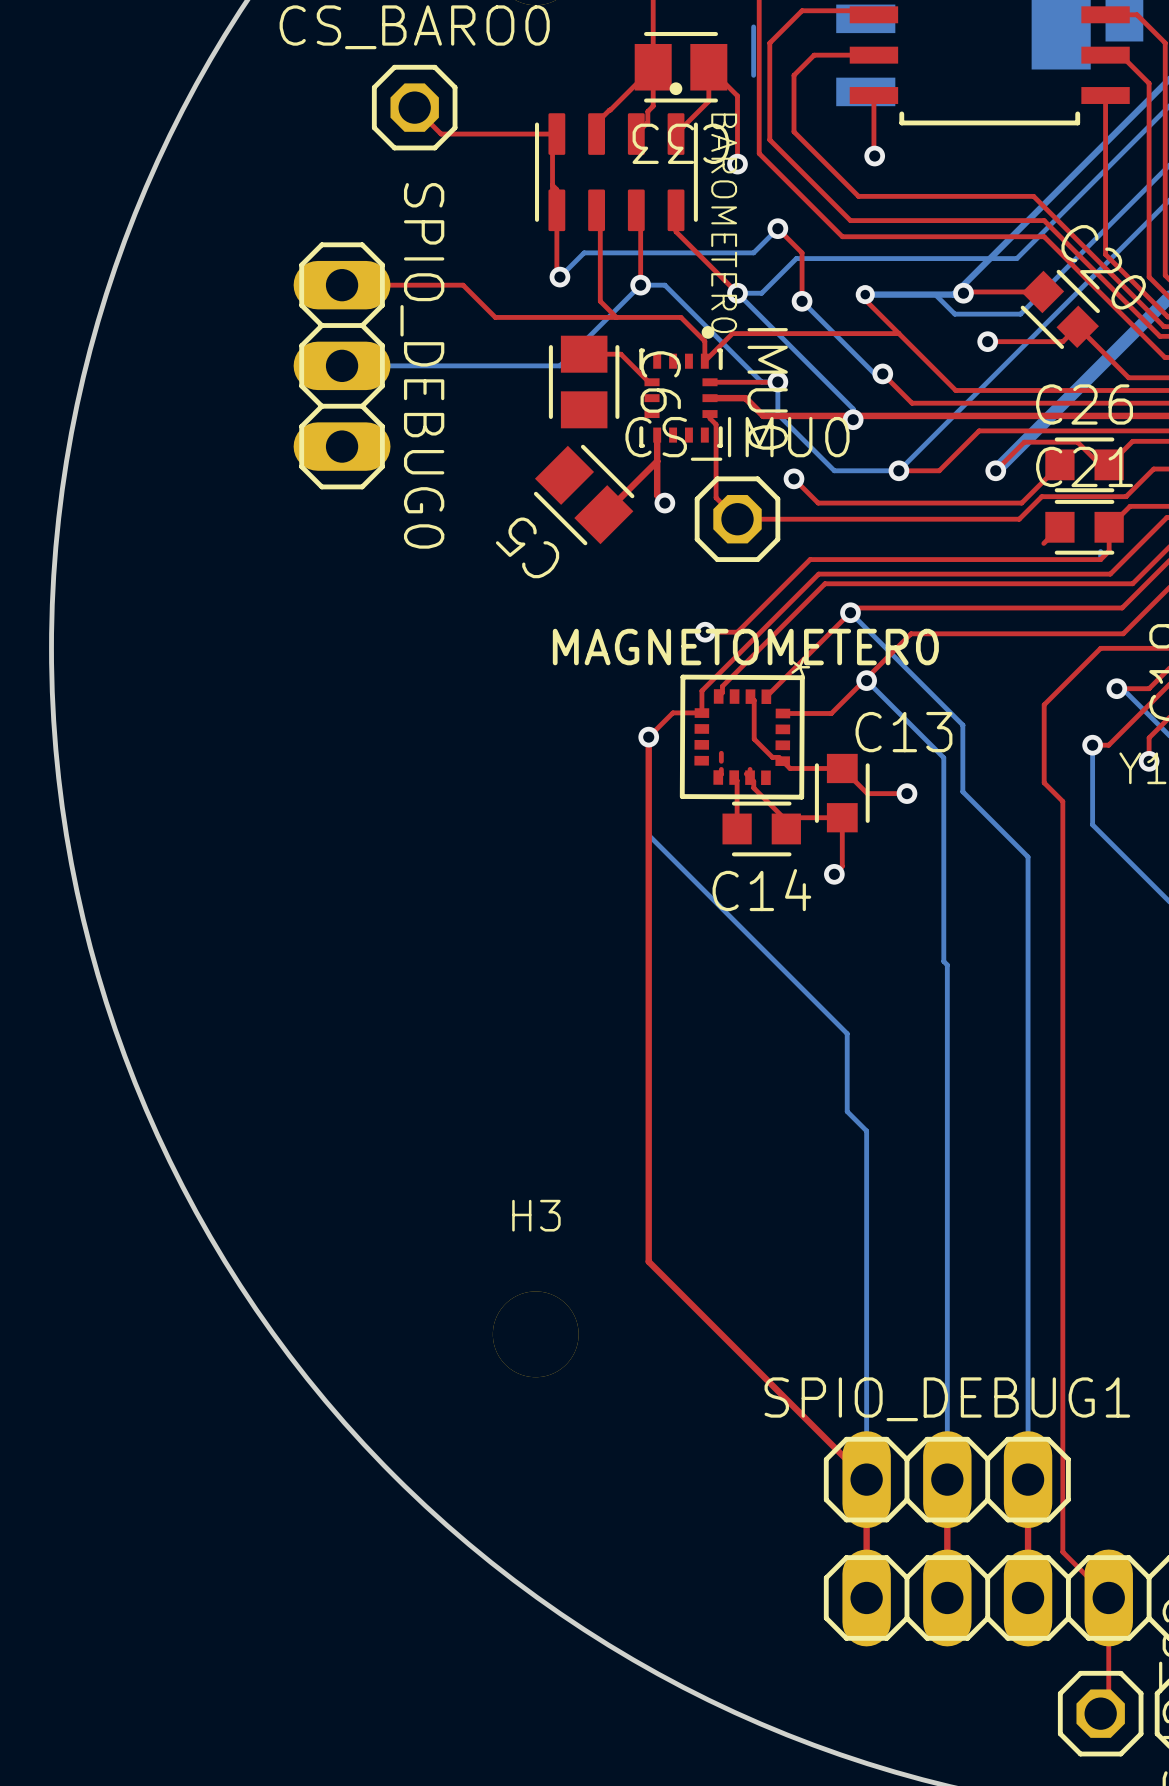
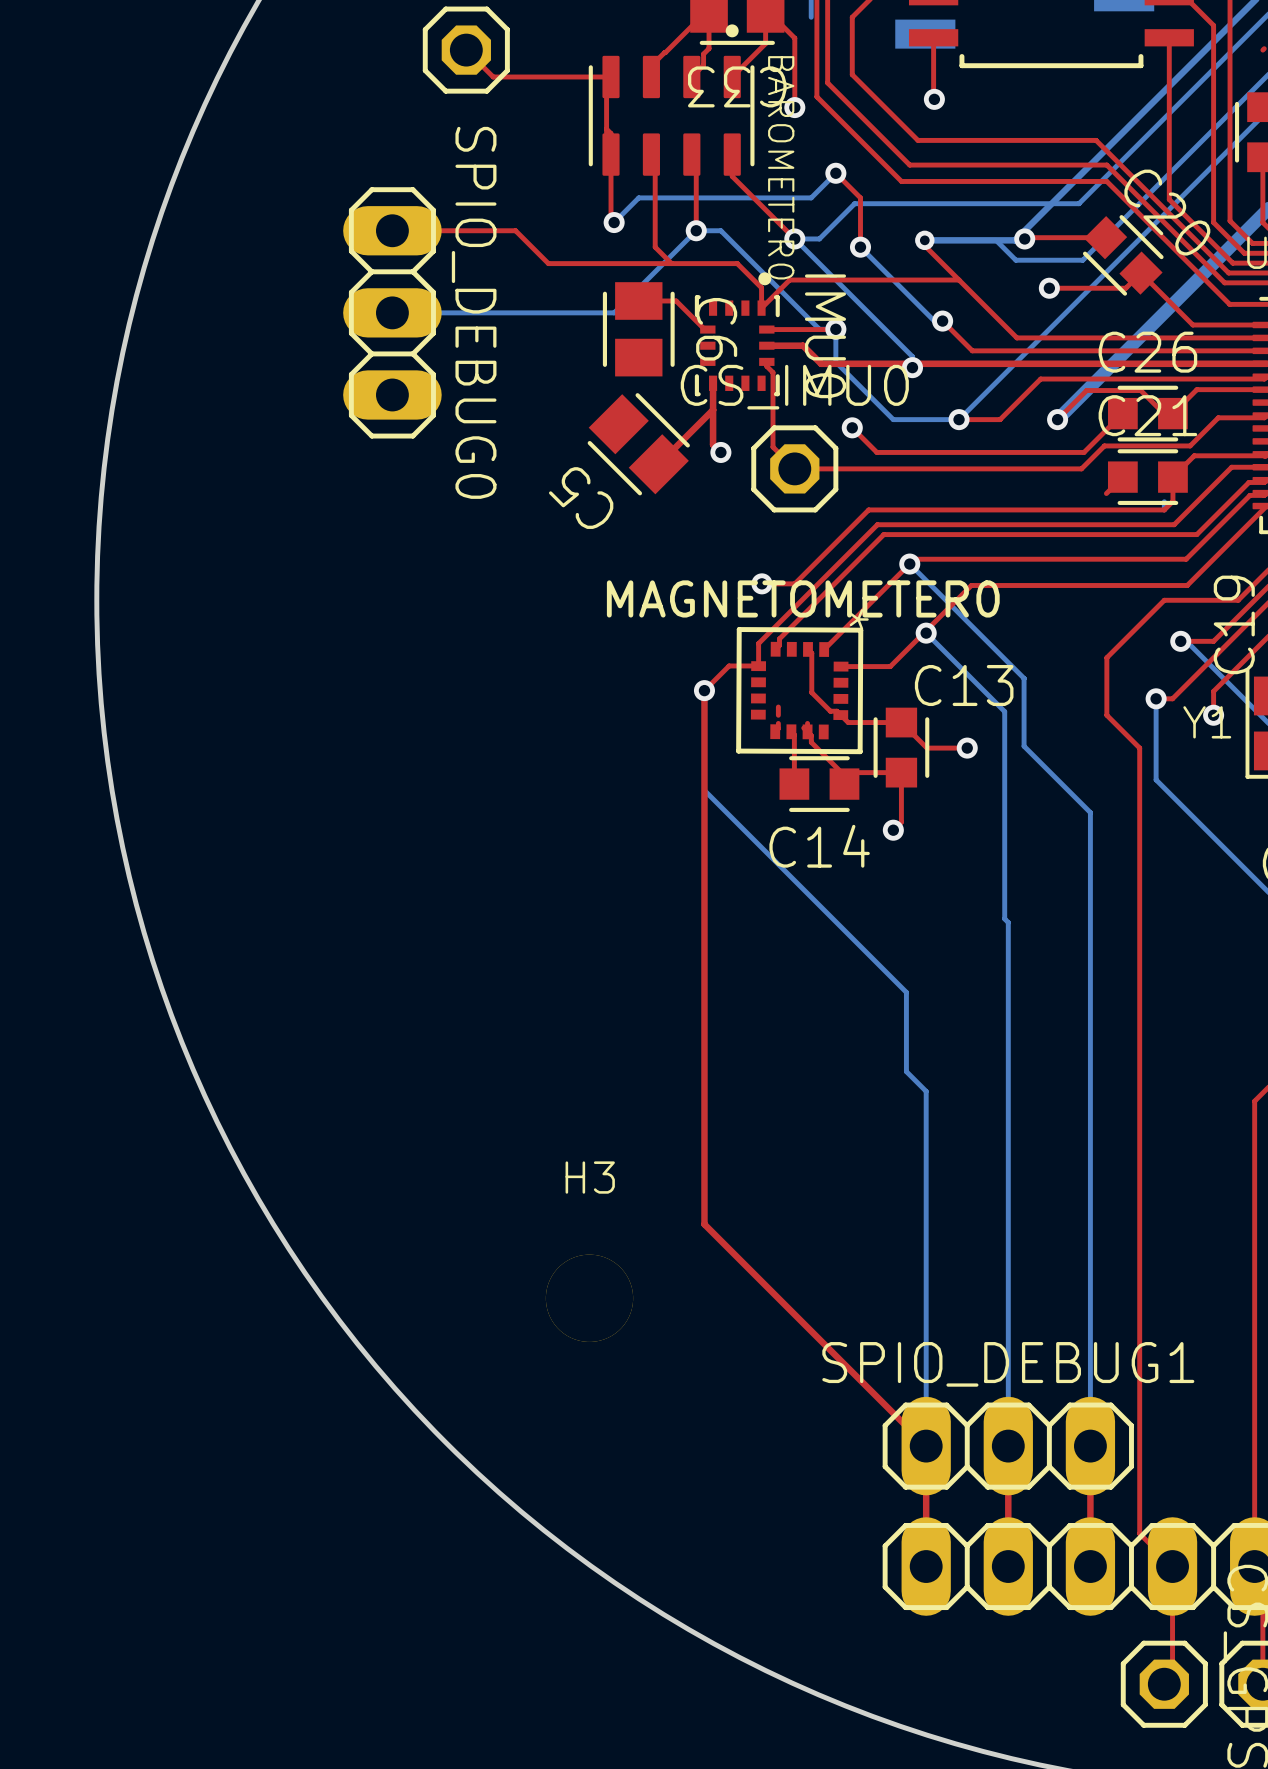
top track: (1044, 761) (1044, 782) (1062, 801) (1062, 1552) (1076, 1565) -> (1106, 715) (1139, 748) (1139, 1533)

